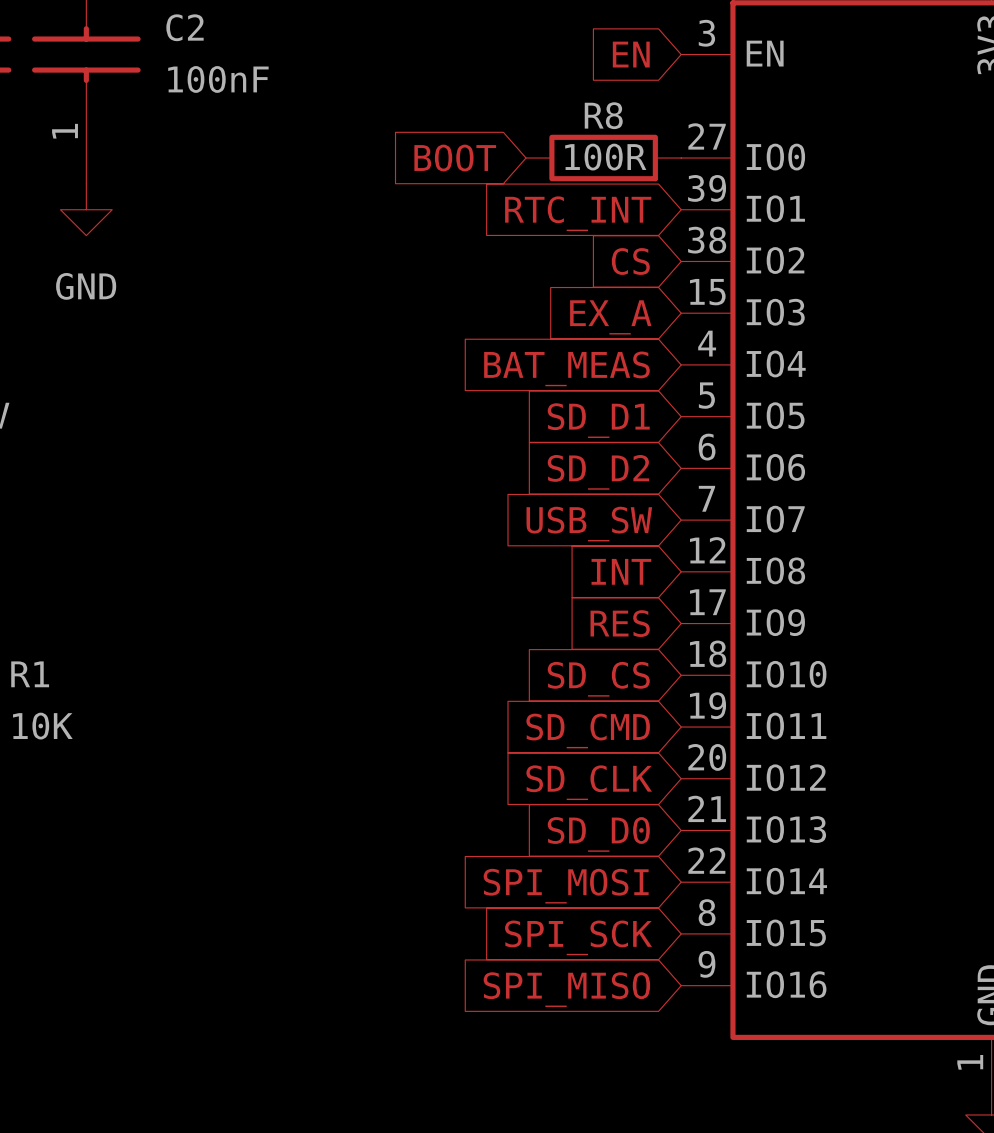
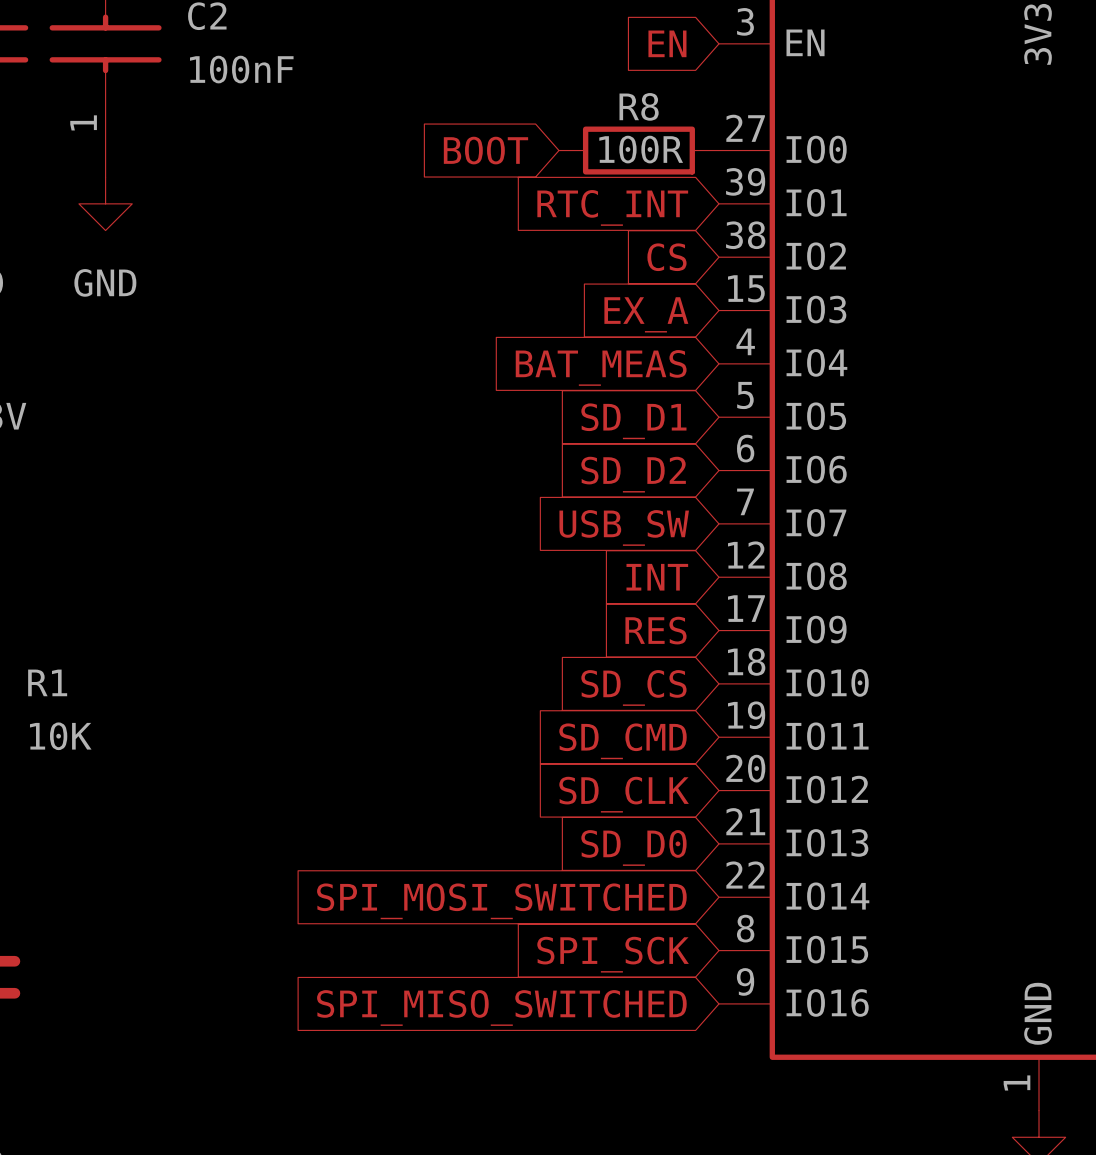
global label: SPI_MOSI (566, 886) -> SPI_MOSI_SWITCHED (501, 901)
global label: SPI_MISO (566, 989) -> SPI_MISO_SWITCHED (501, 1008)

